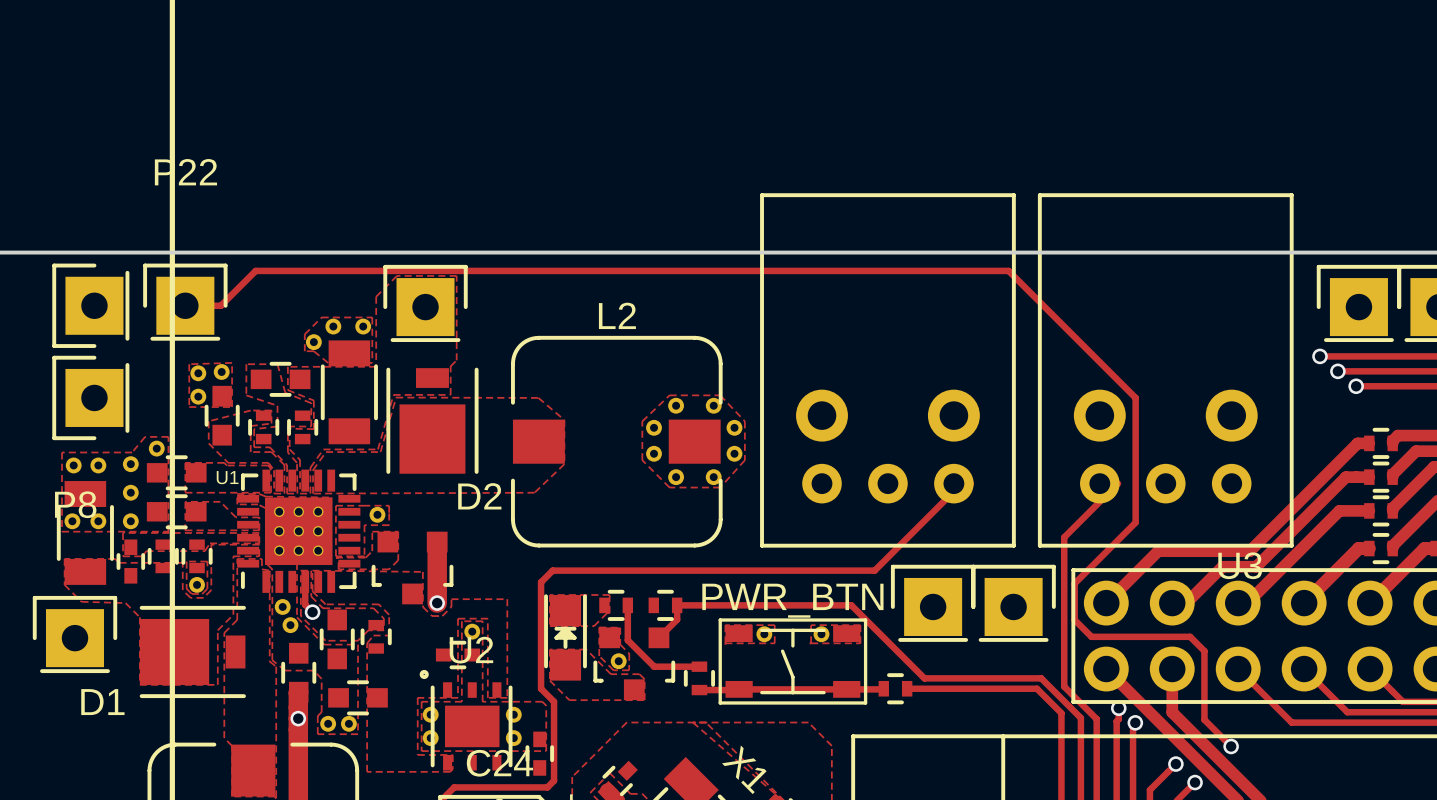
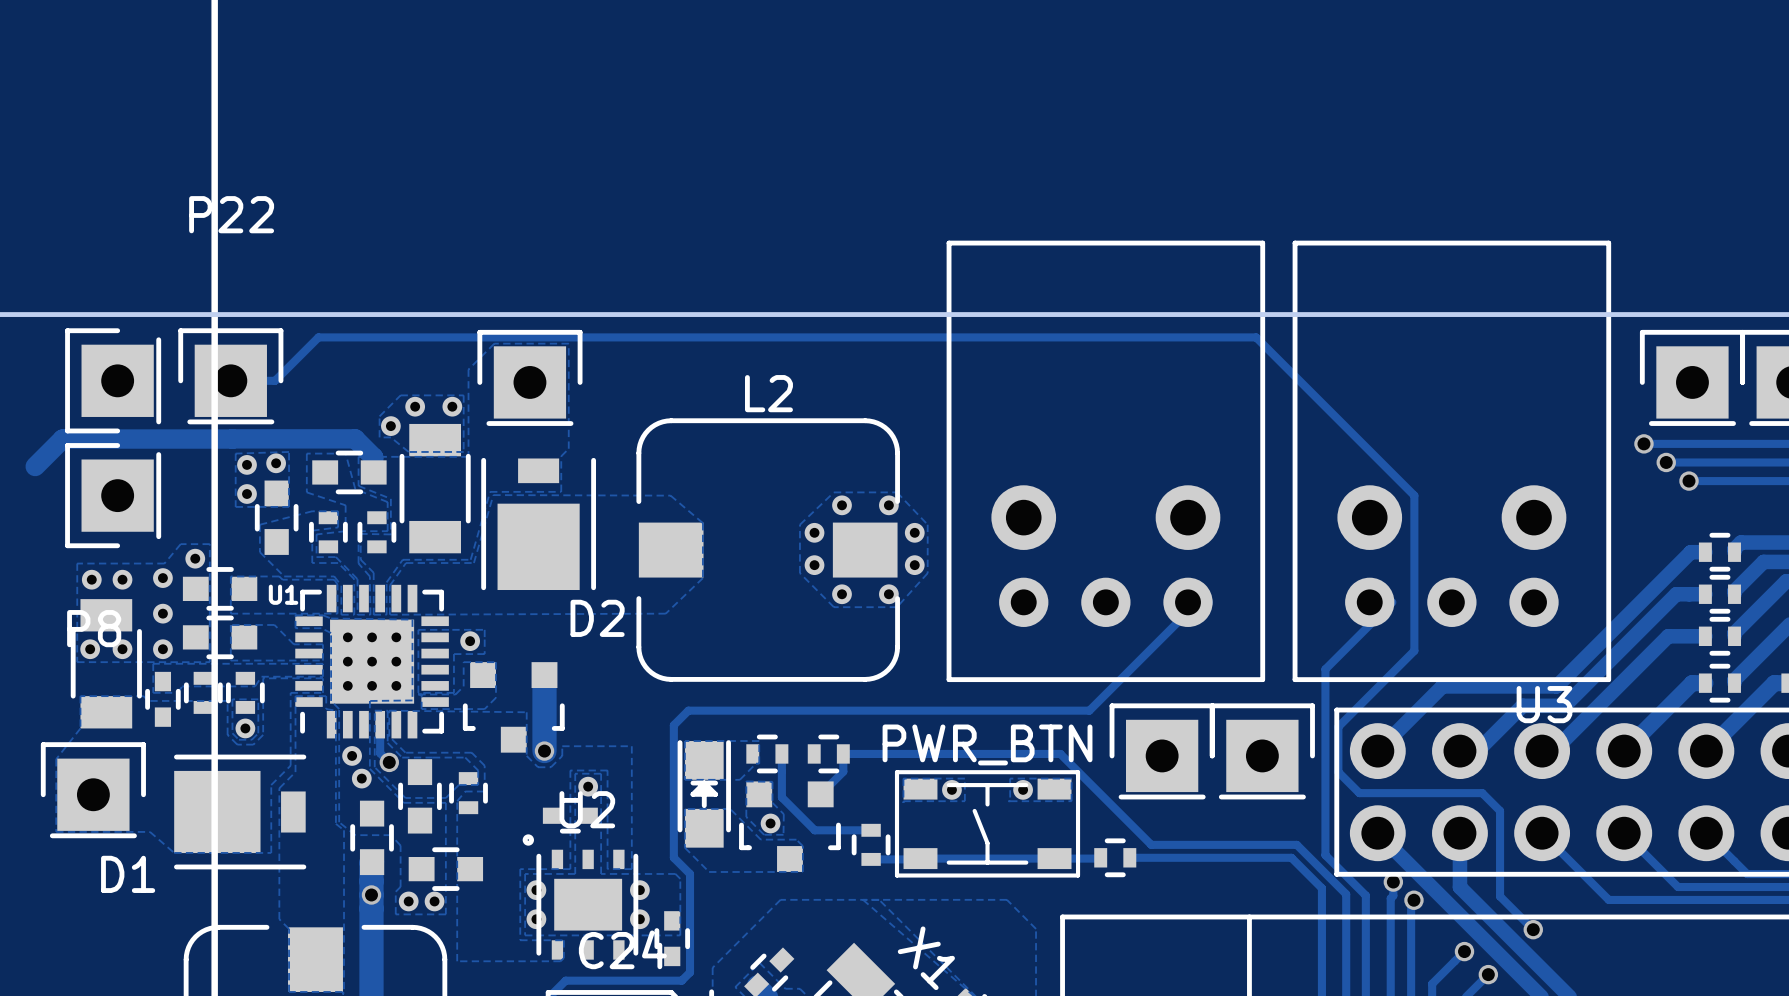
track: none -> (232, 438) (355, 438) (373, 457) (373, 472)
track: none -> (232, 439) (62, 439) (35, 466)
zone outline: (64, 584) (81, 601) (125, 603) (139, 617) (139, 684) -> (80, 728) (56, 759) (56, 831) (149, 831) (174, 852)

